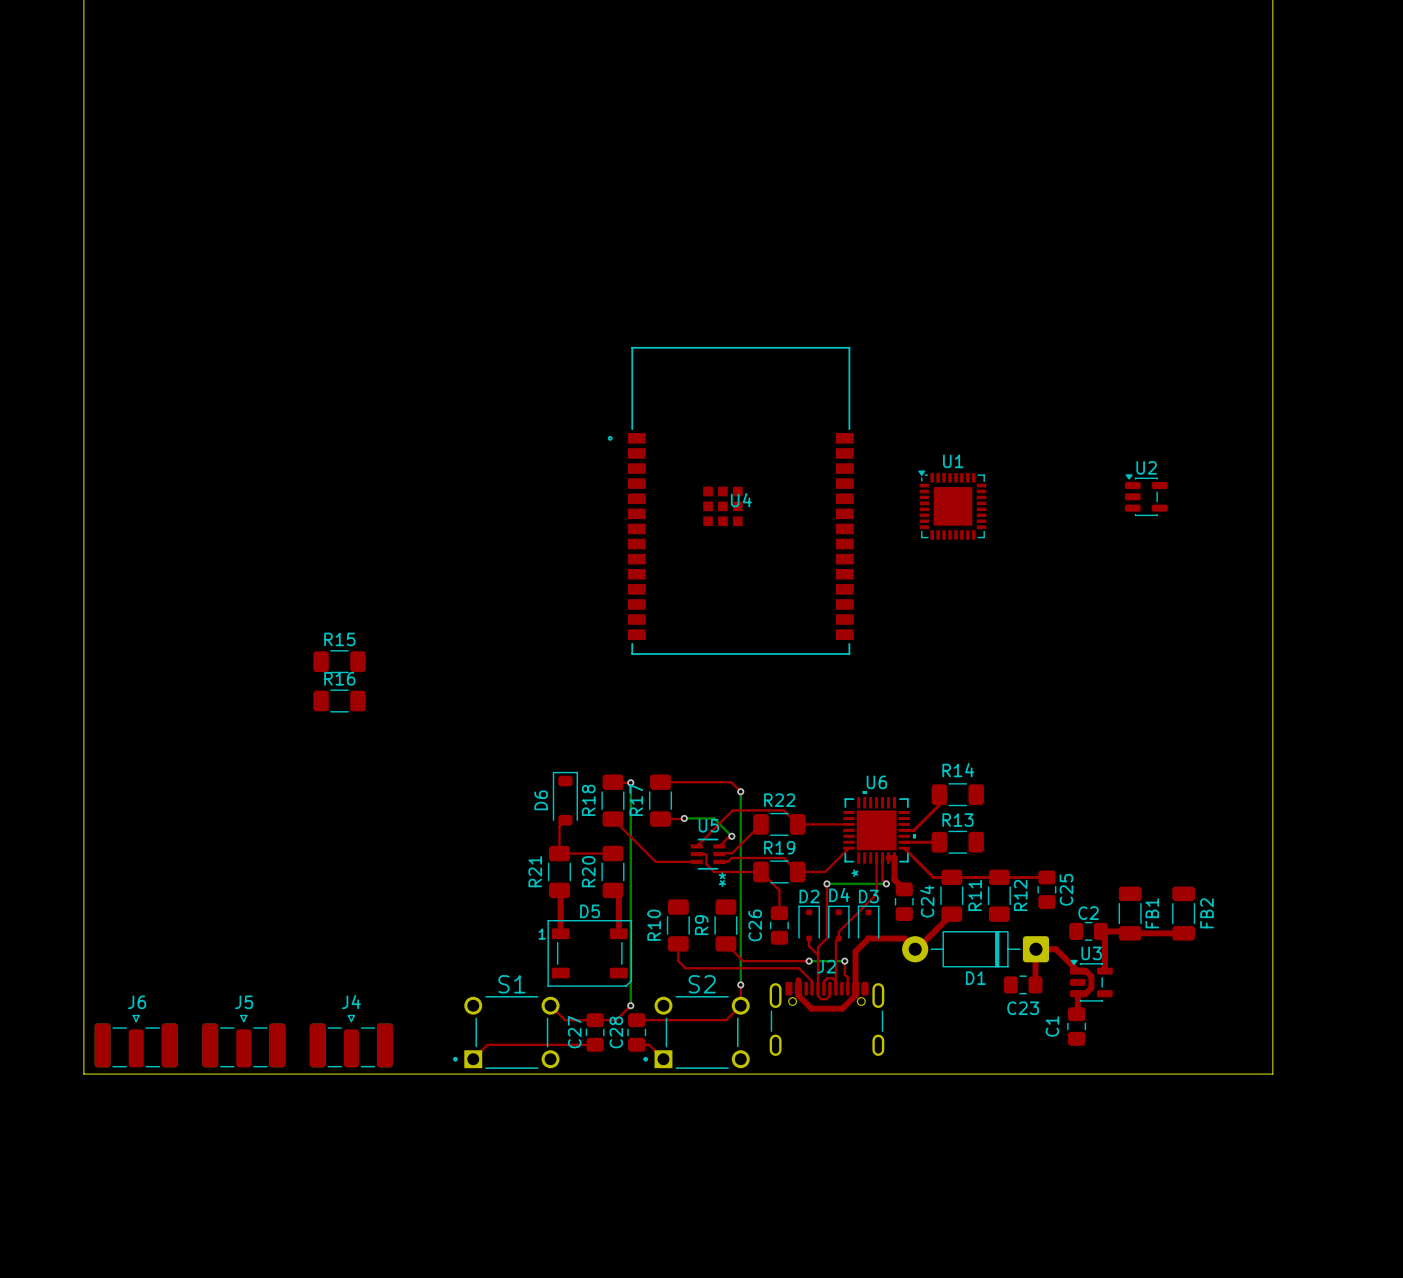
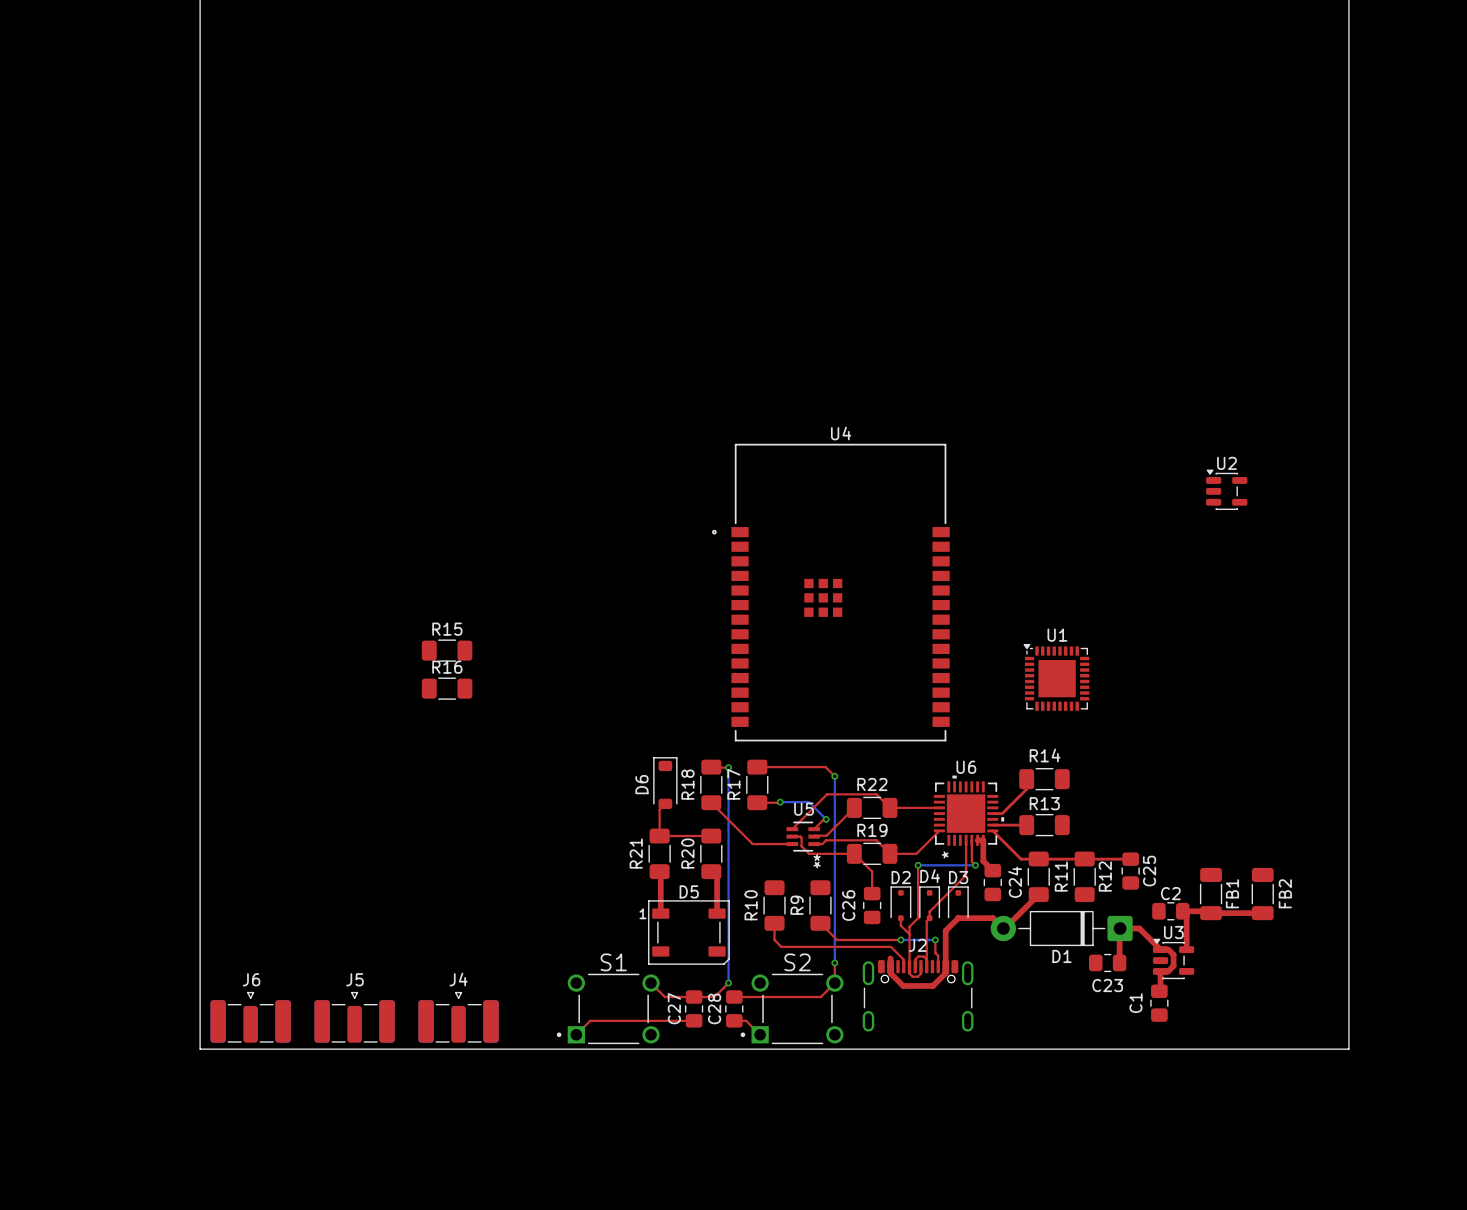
U4 position: (730, 500) -> (830, 592)
U4 name position: U4 (741, 500) -> U4 (841, 433)
U1 position: (952, 505) -> (1056, 677)

